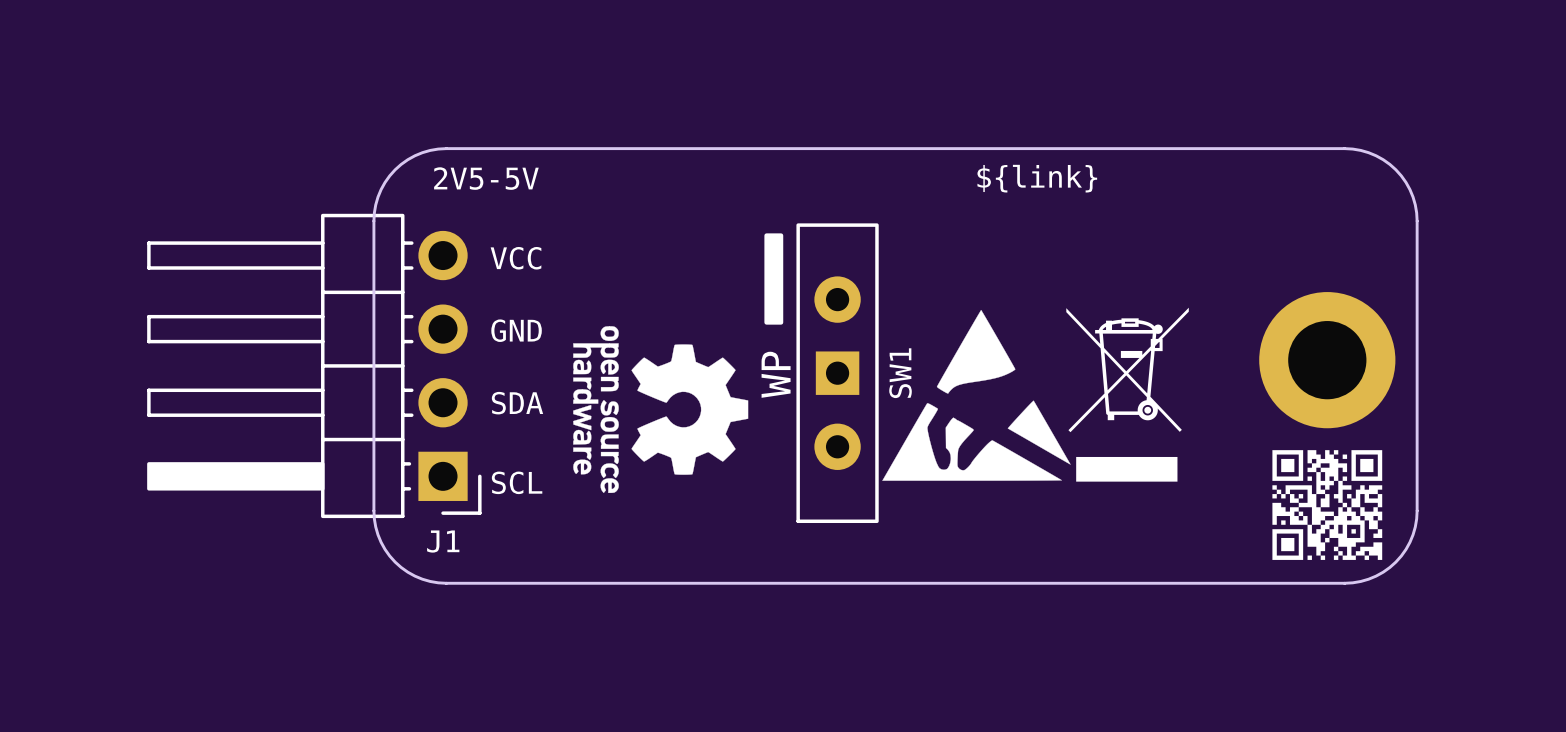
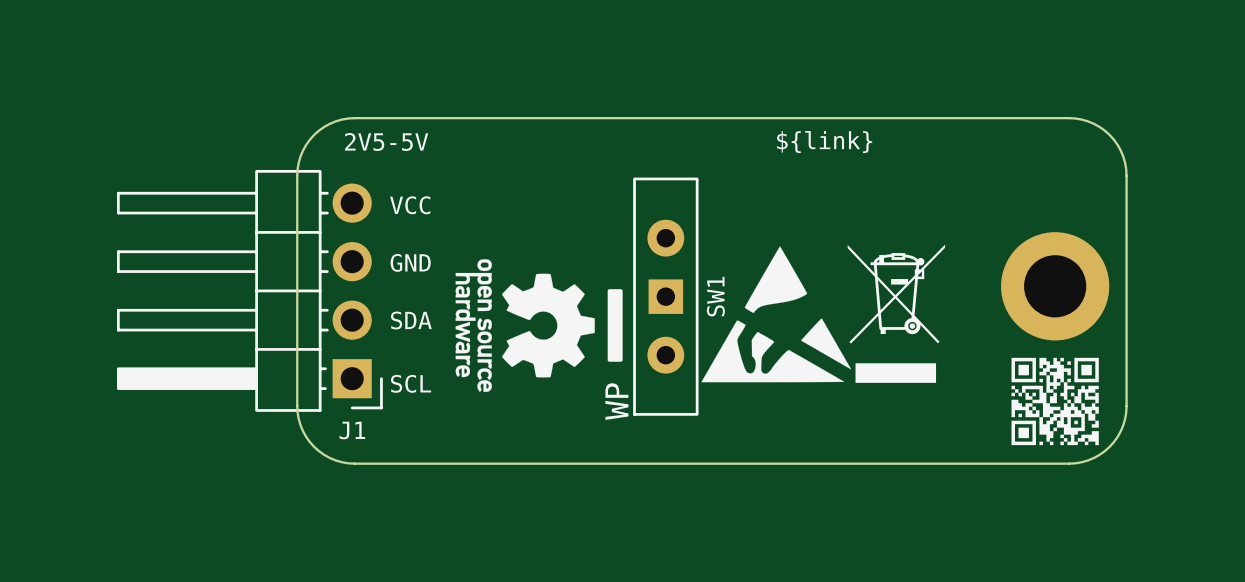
drawing position: (773, 279) -> (615, 325)
text position: WP (776, 374) -> WP (616, 401)

